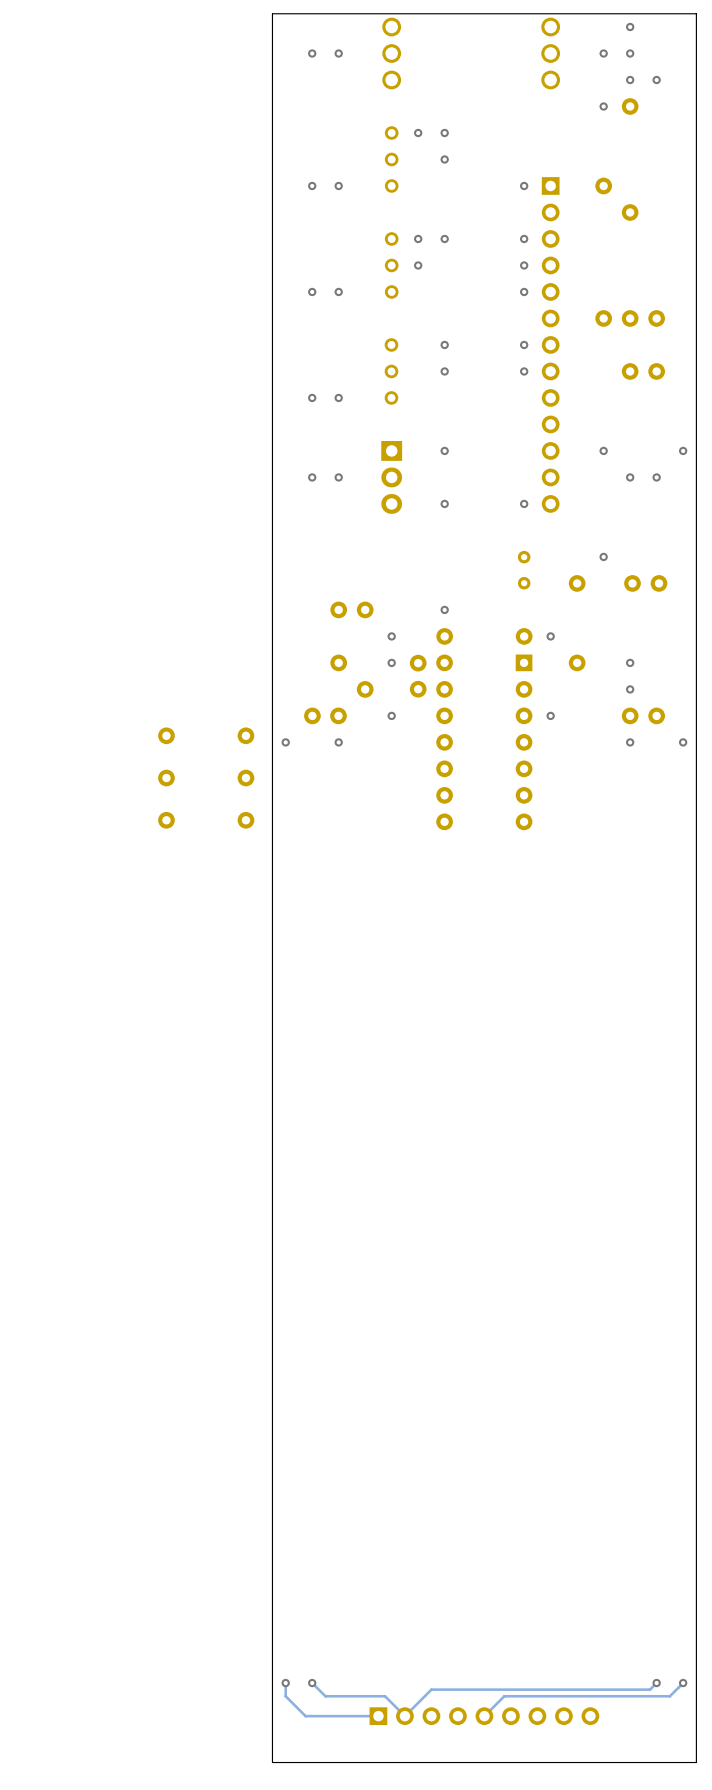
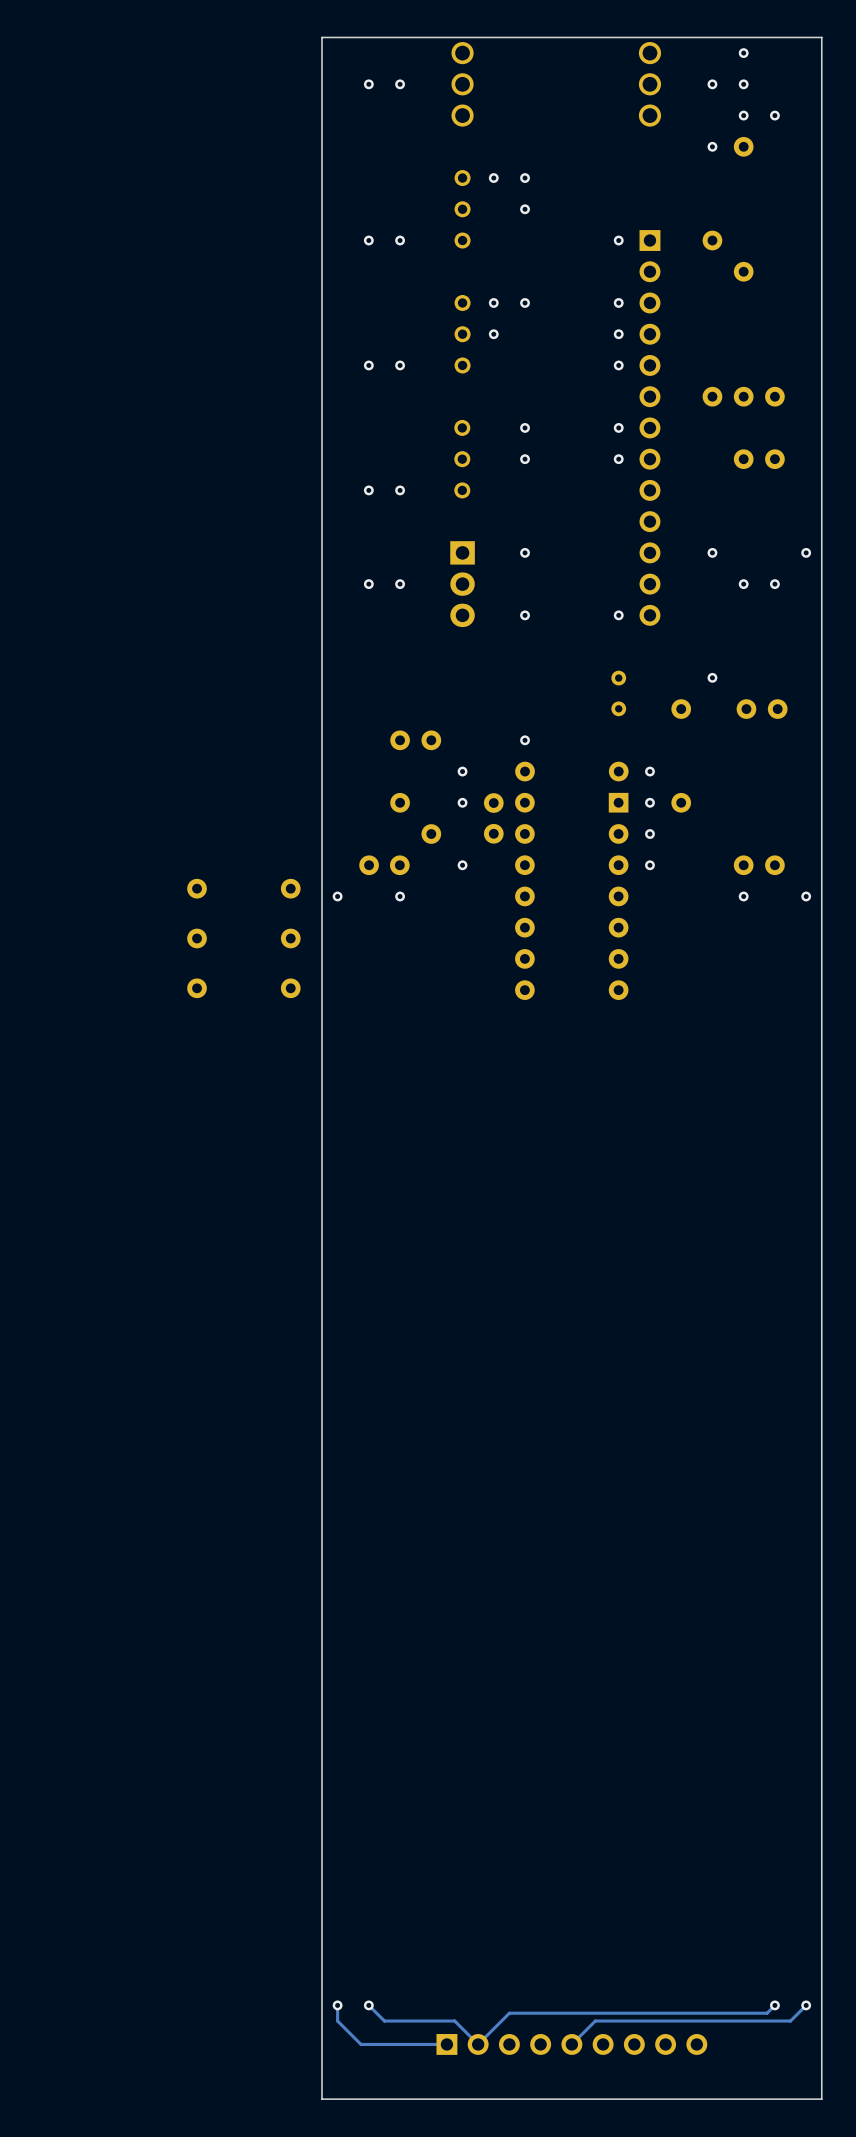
via: none -> (649, 802)
via: (630, 662) -> none
via: none -> (649, 834)
via: (630, 689) -> none

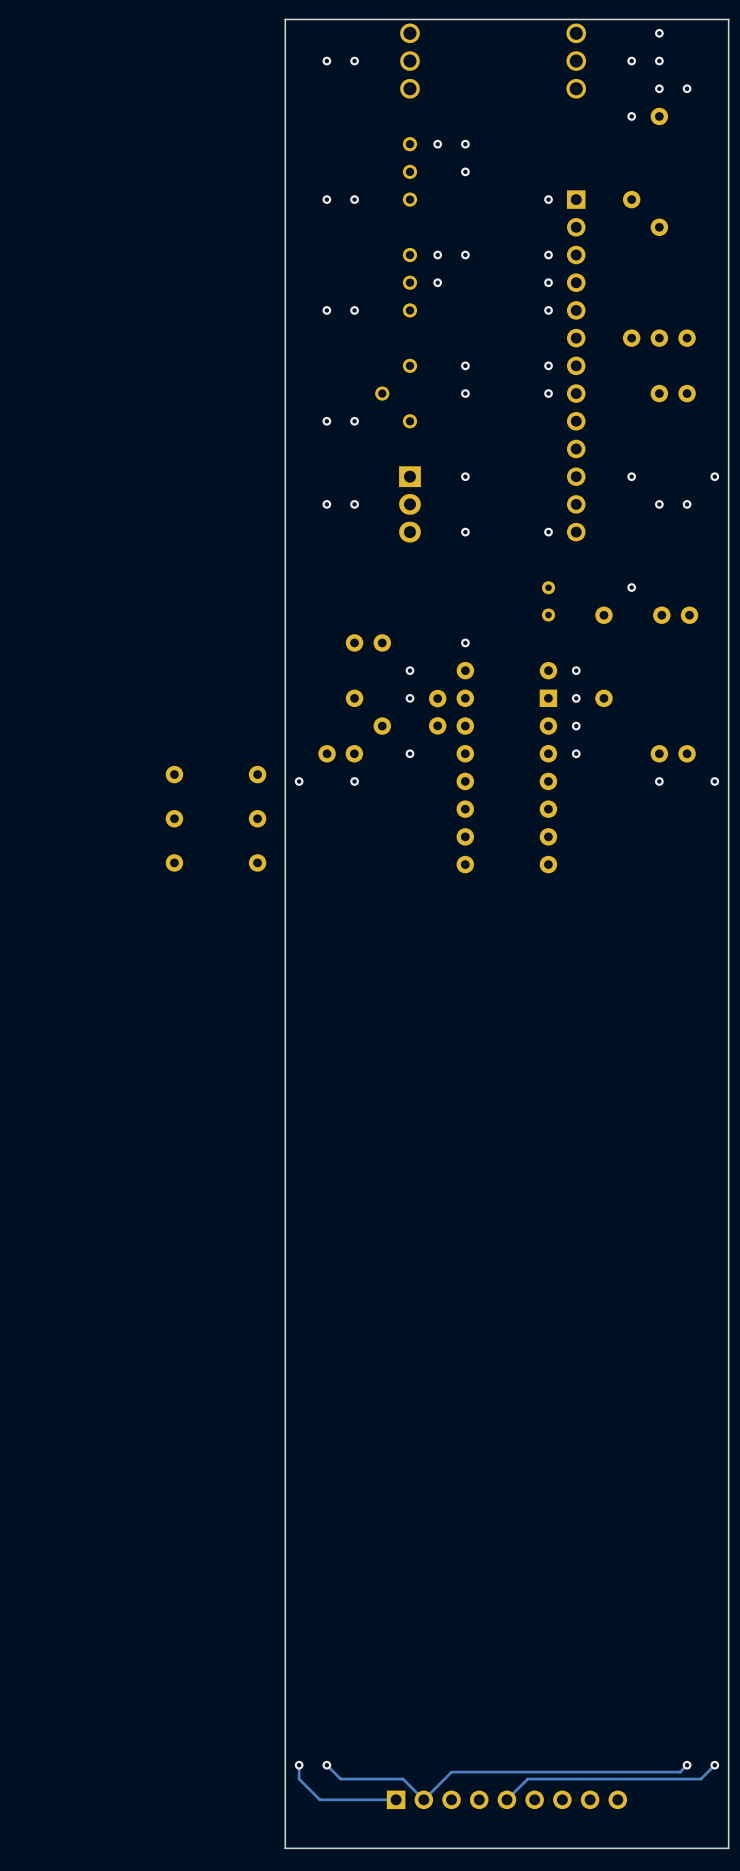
part: none -> (396, 393)
part: (462, 459) -> none

